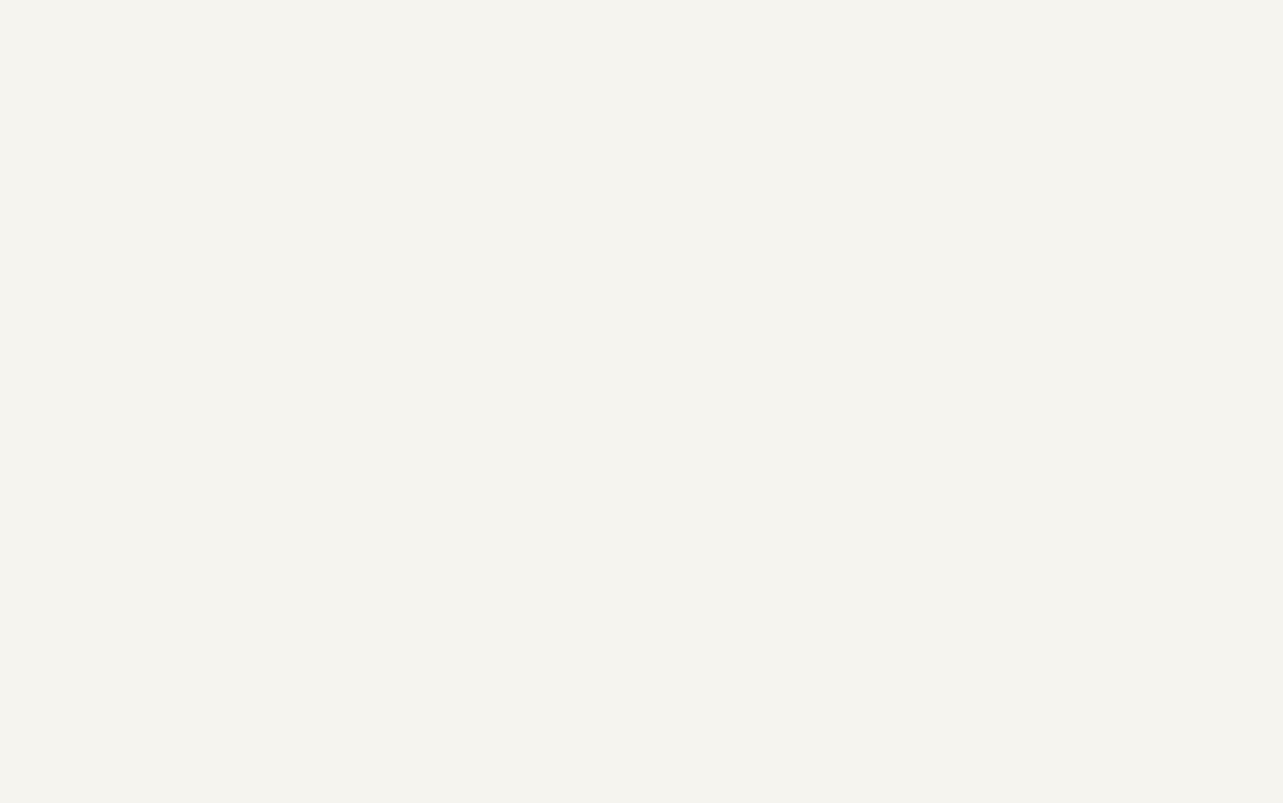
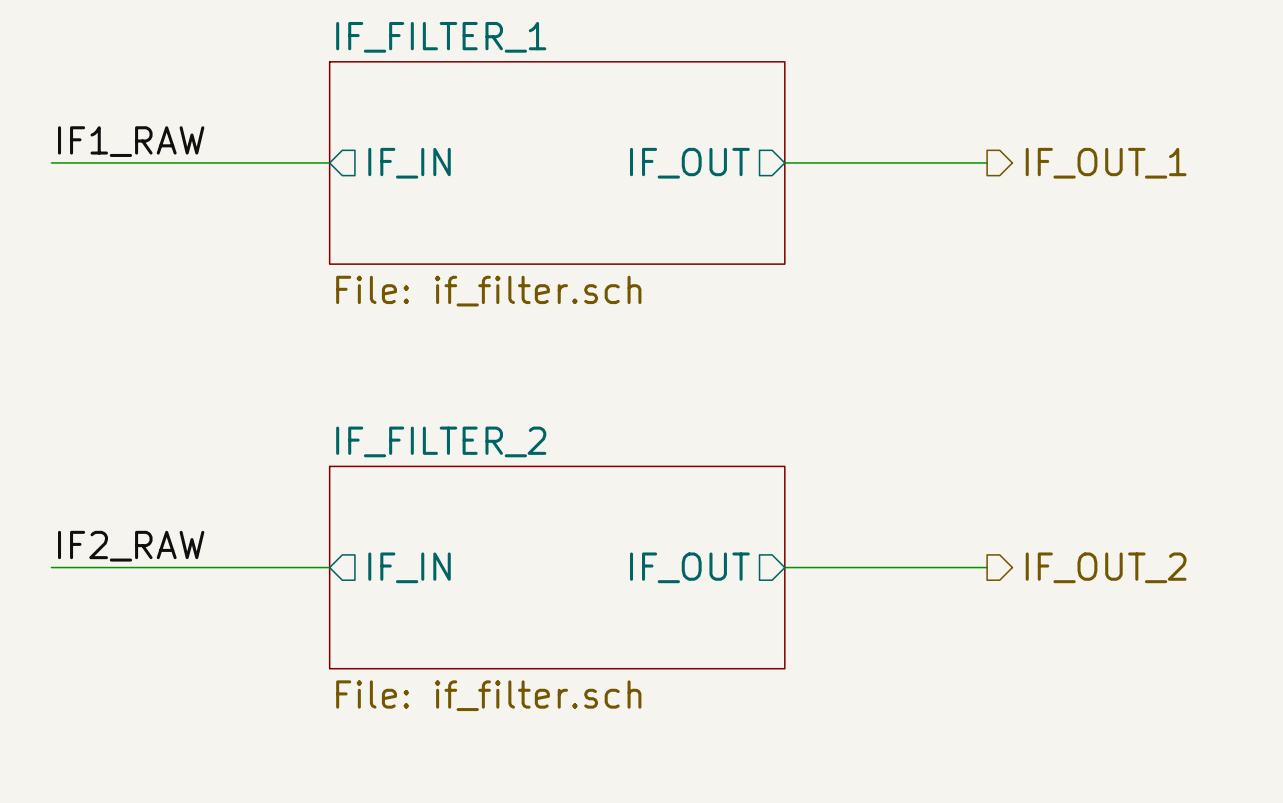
label: none -> IF1_RAW (131, 141)
wire: none -> (51, 162) (329, 162)
sheet IF_FILTER_1: none -> File: if_filter.sch (557, 162)
wire: none -> (784, 162) (987, 162)
sheet pin: none -> IF_IN (409, 163)
sheet pin: none -> IF_OUT (689, 163)
hierarchical label: none -> IF_OUT_1 (1106, 163)
label: none -> IF2_RAW (131, 546)
wire: none -> (51, 567) (329, 567)
sheet pin: none -> IF_IN (409, 567)
sheet IF_FILTER_2: none -> File: if_filter.sch (557, 567)
sheet pin: none -> IF_OUT (689, 567)
wire: none -> (784, 567) (987, 567)
hierarchical label: none -> IF_OUT_2 (1106, 567)

